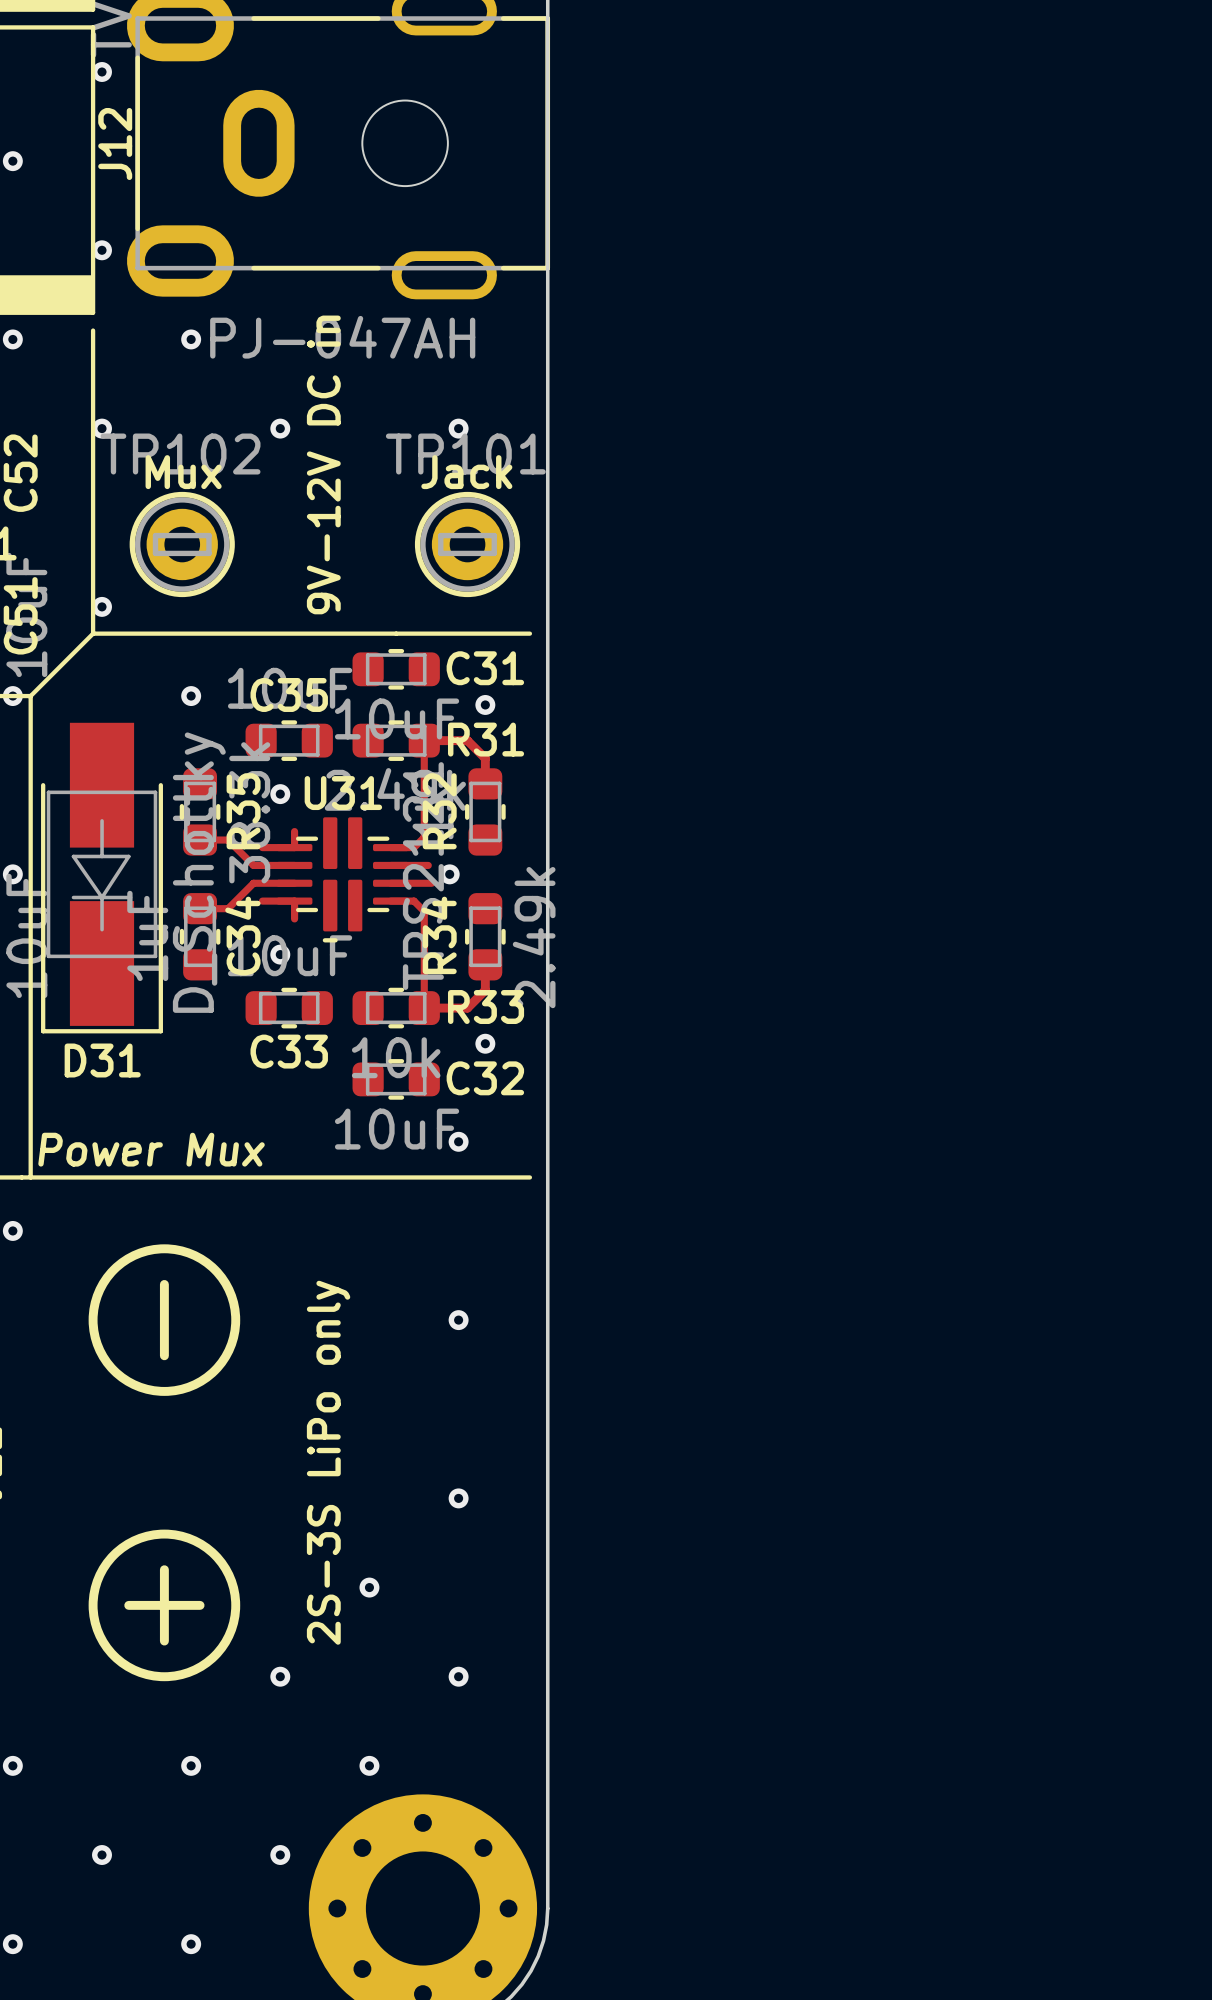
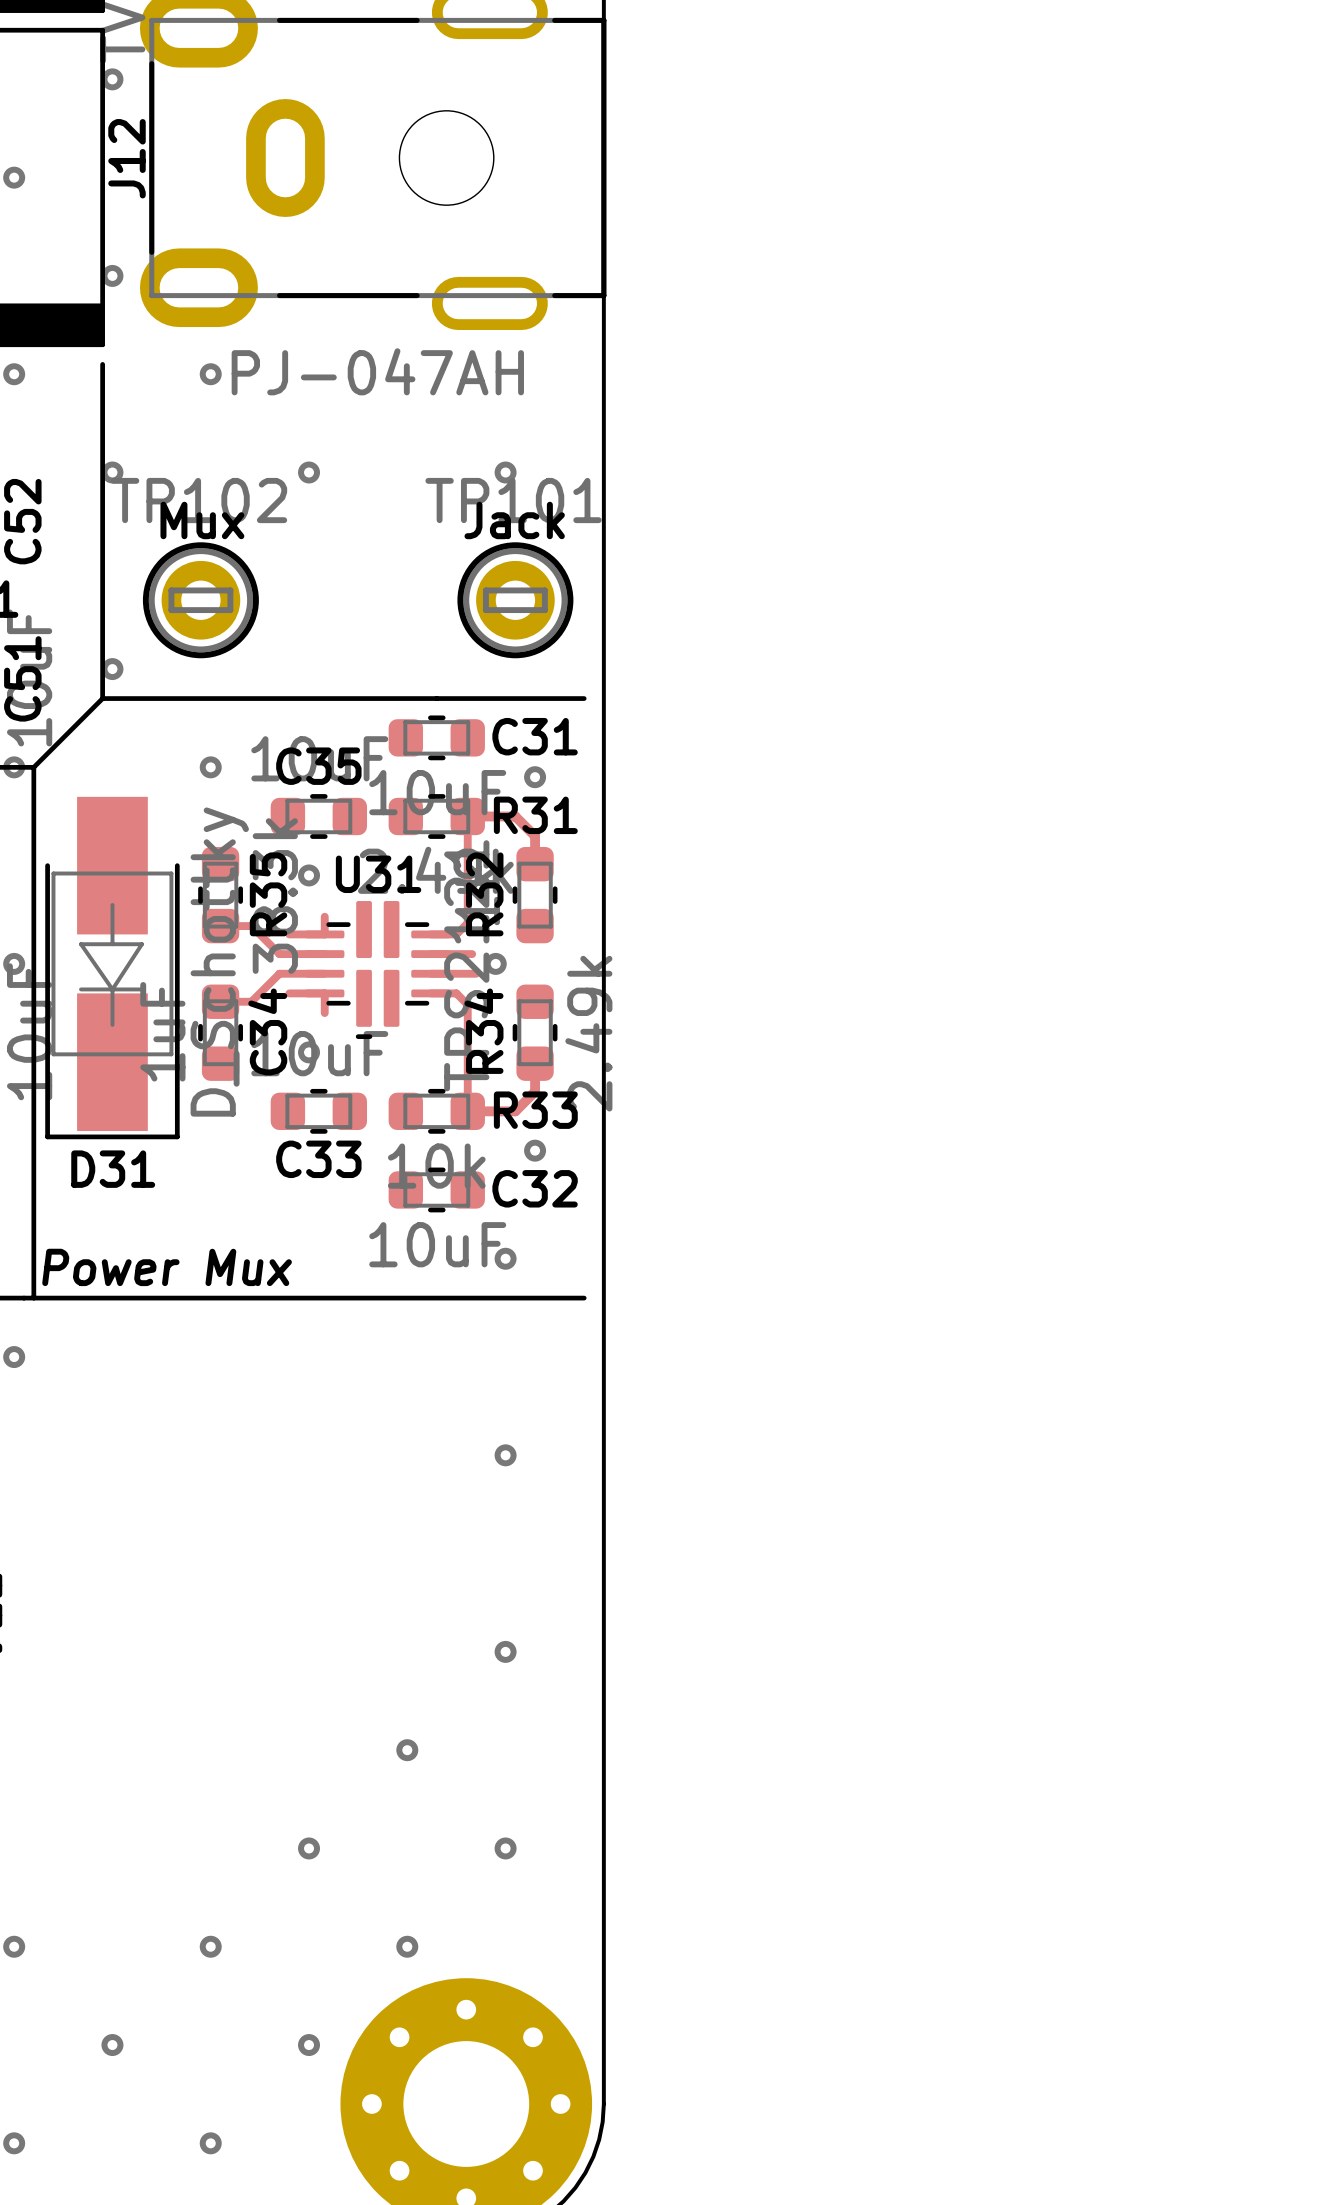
text: 9V-12V DC in (323, 464) -> none
drawing: [88, 1244, 241, 1396] -> none
line: (164, 1284) (164, 1355) -> none
text: 2S-3S LiPo only (328, 1462) -> none
drawing: [88, 1529, 241, 1682] -> none
line: (164, 1569) (164, 1641) -> none
line: (128, 1605) (200, 1605) -> none

